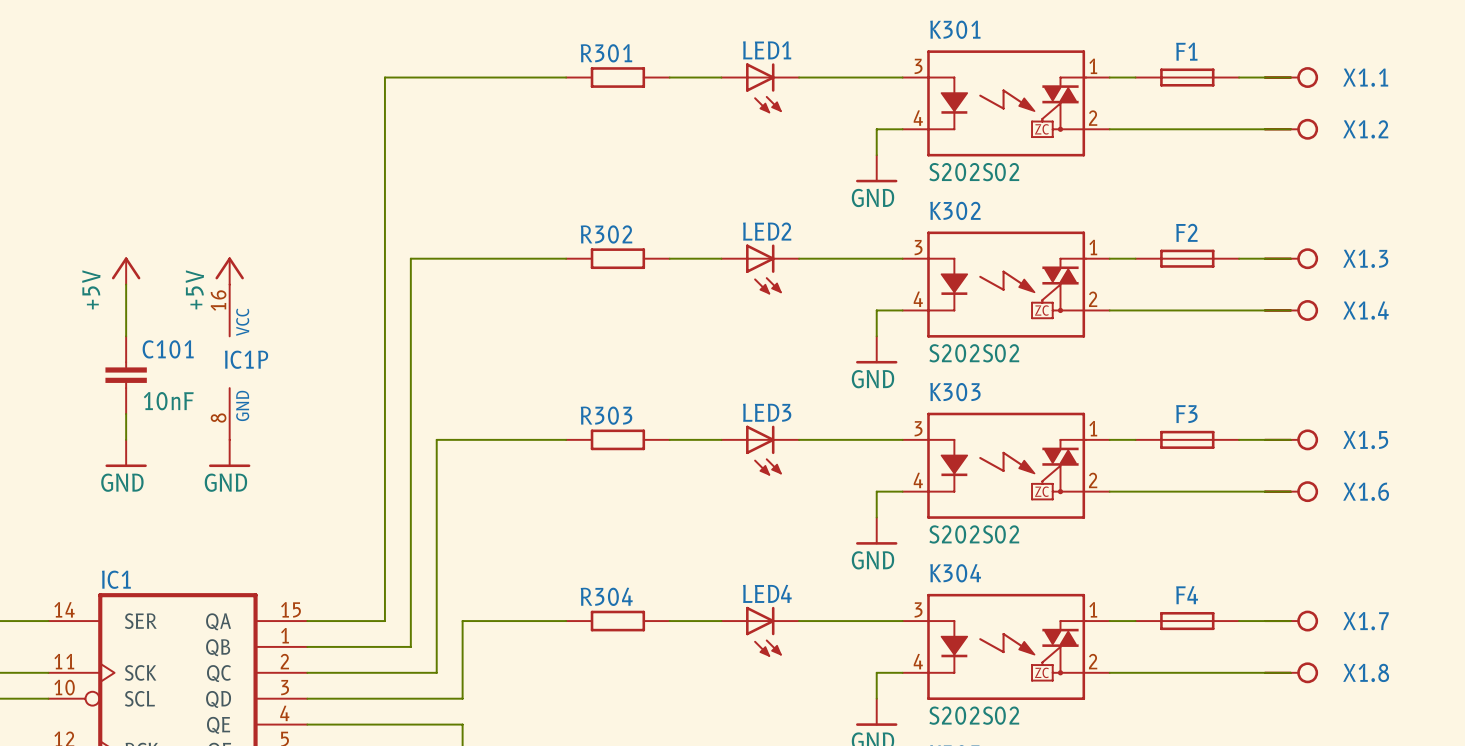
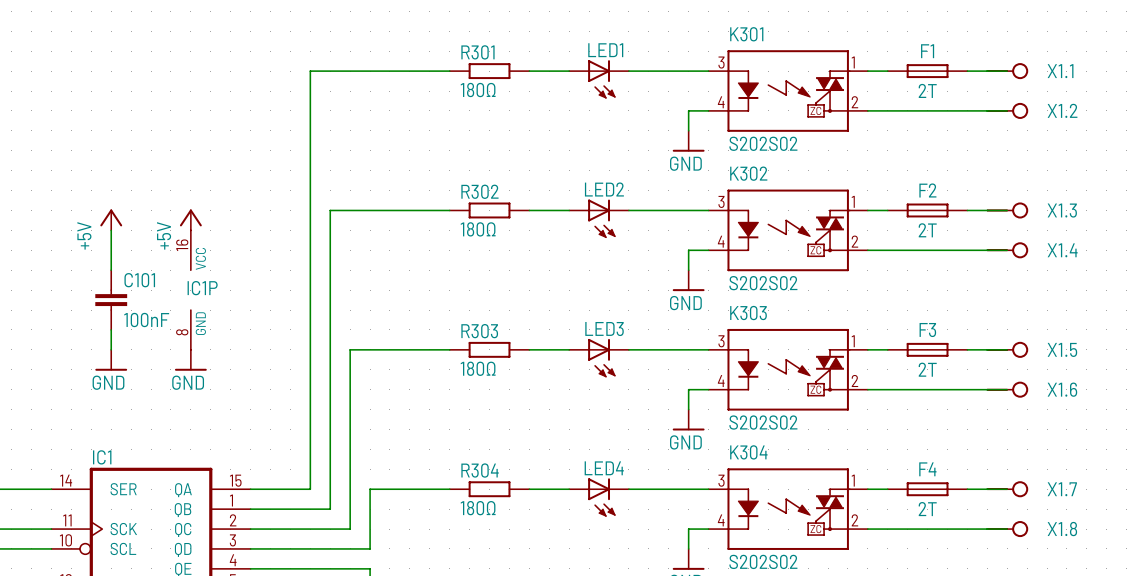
R301 value: none -> 180Ω (478, 90)
F1 value: none -> 2T (927, 90)
R302 value: none -> 180Ω (478, 229)
F2 value: none -> 2T (927, 230)
C101 value: 10nF (168, 401) -> 100nF (146, 320)
R303 value: none -> 180Ω (478, 368)
F3 value: none -> 2T (927, 369)
R304 value: none -> 180Ω (478, 508)
F4 value: none -> 2T (927, 509)

